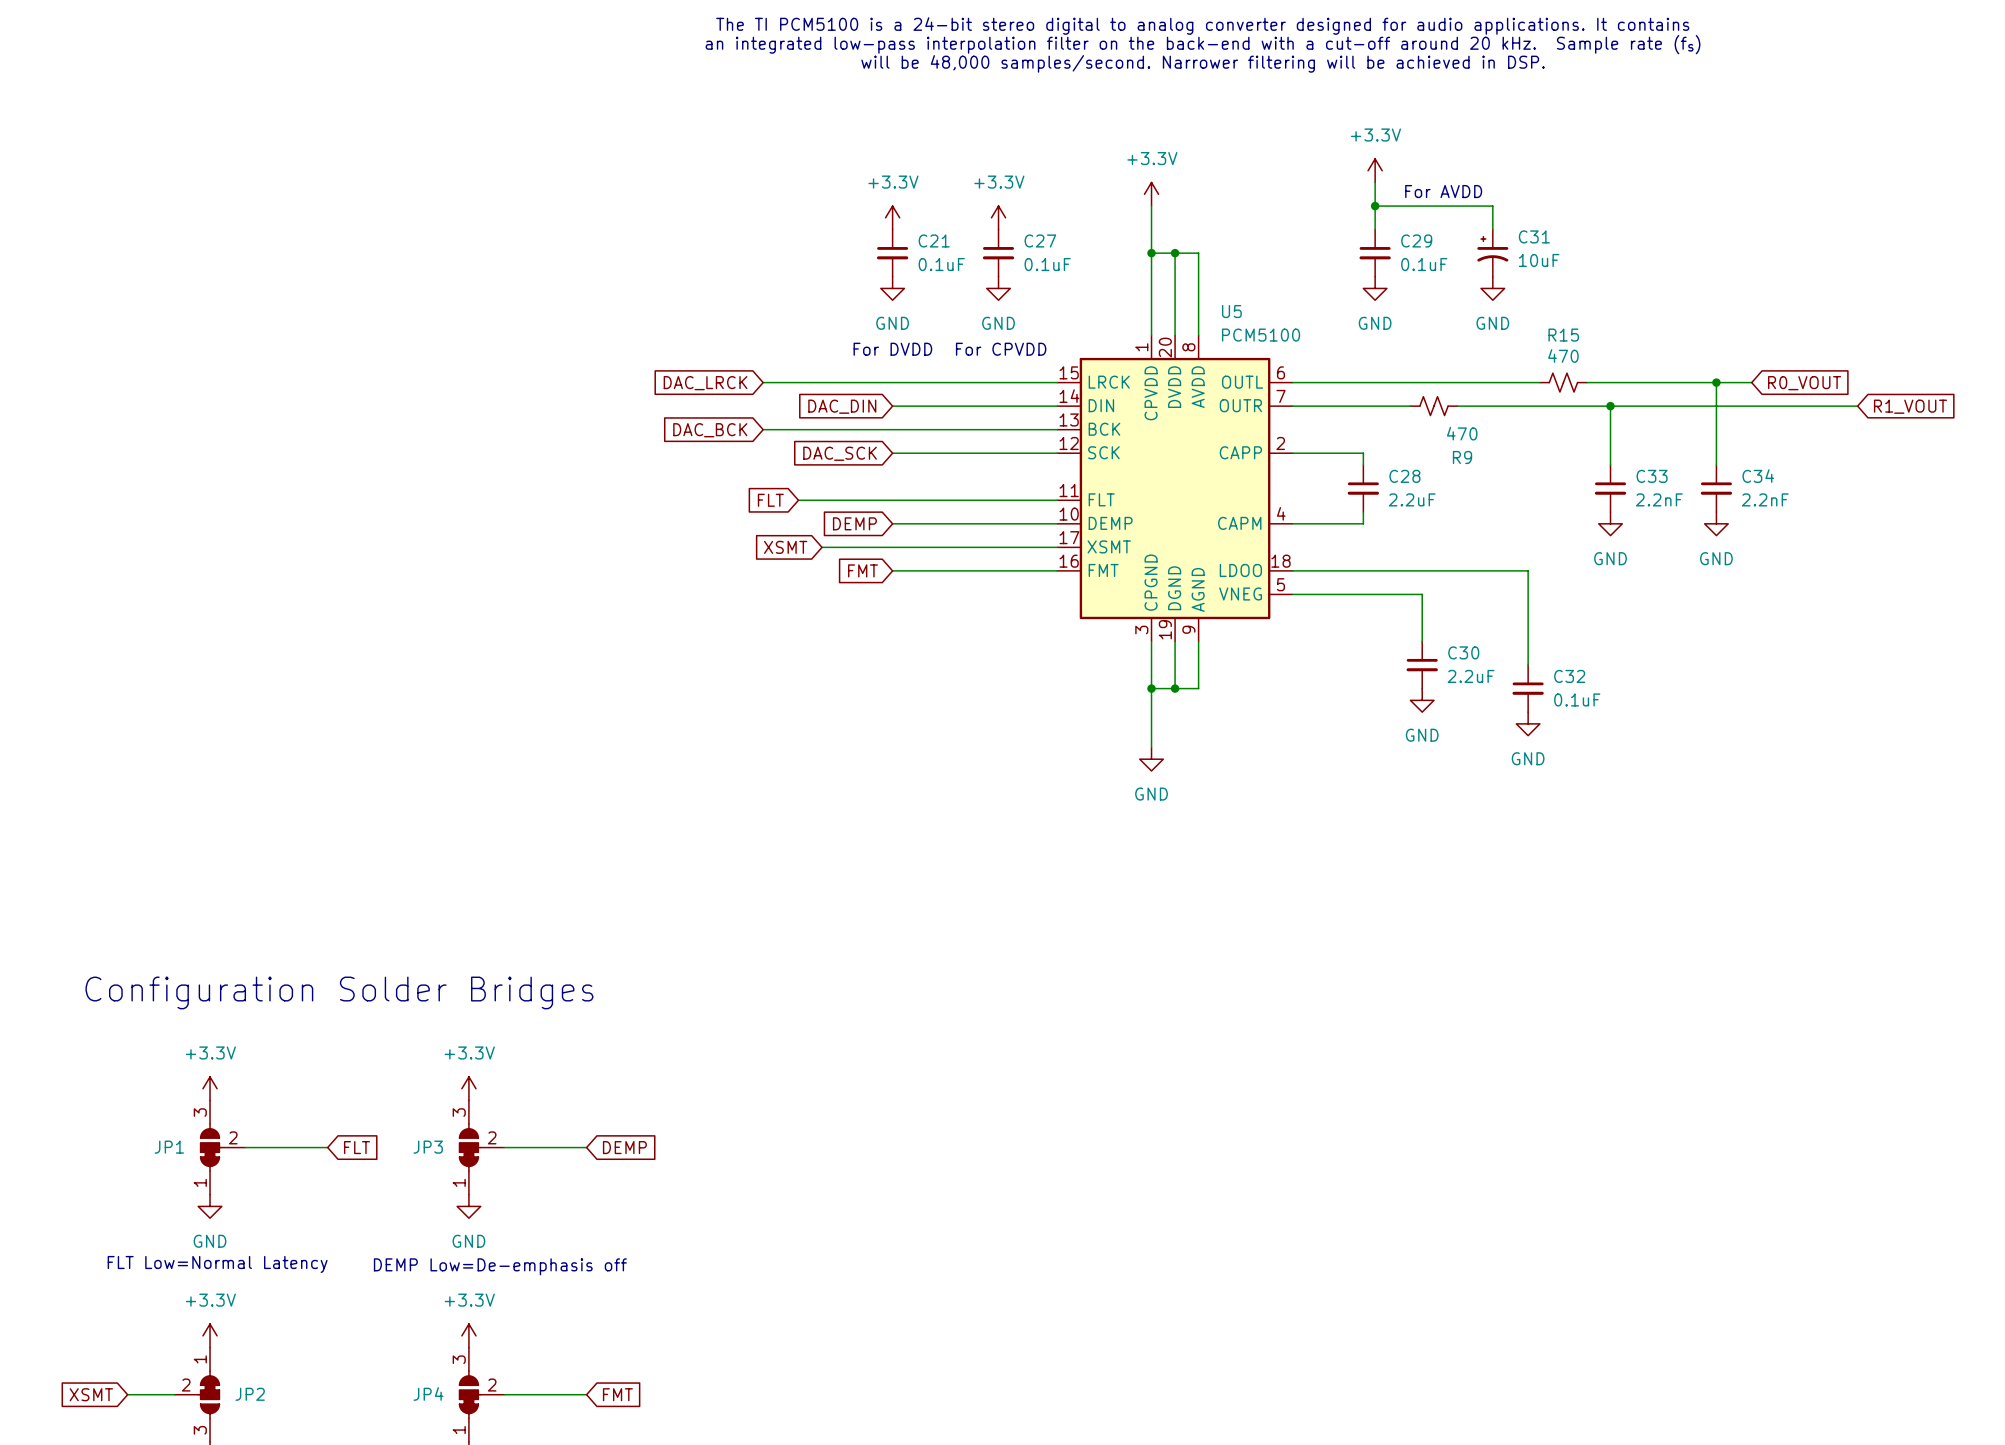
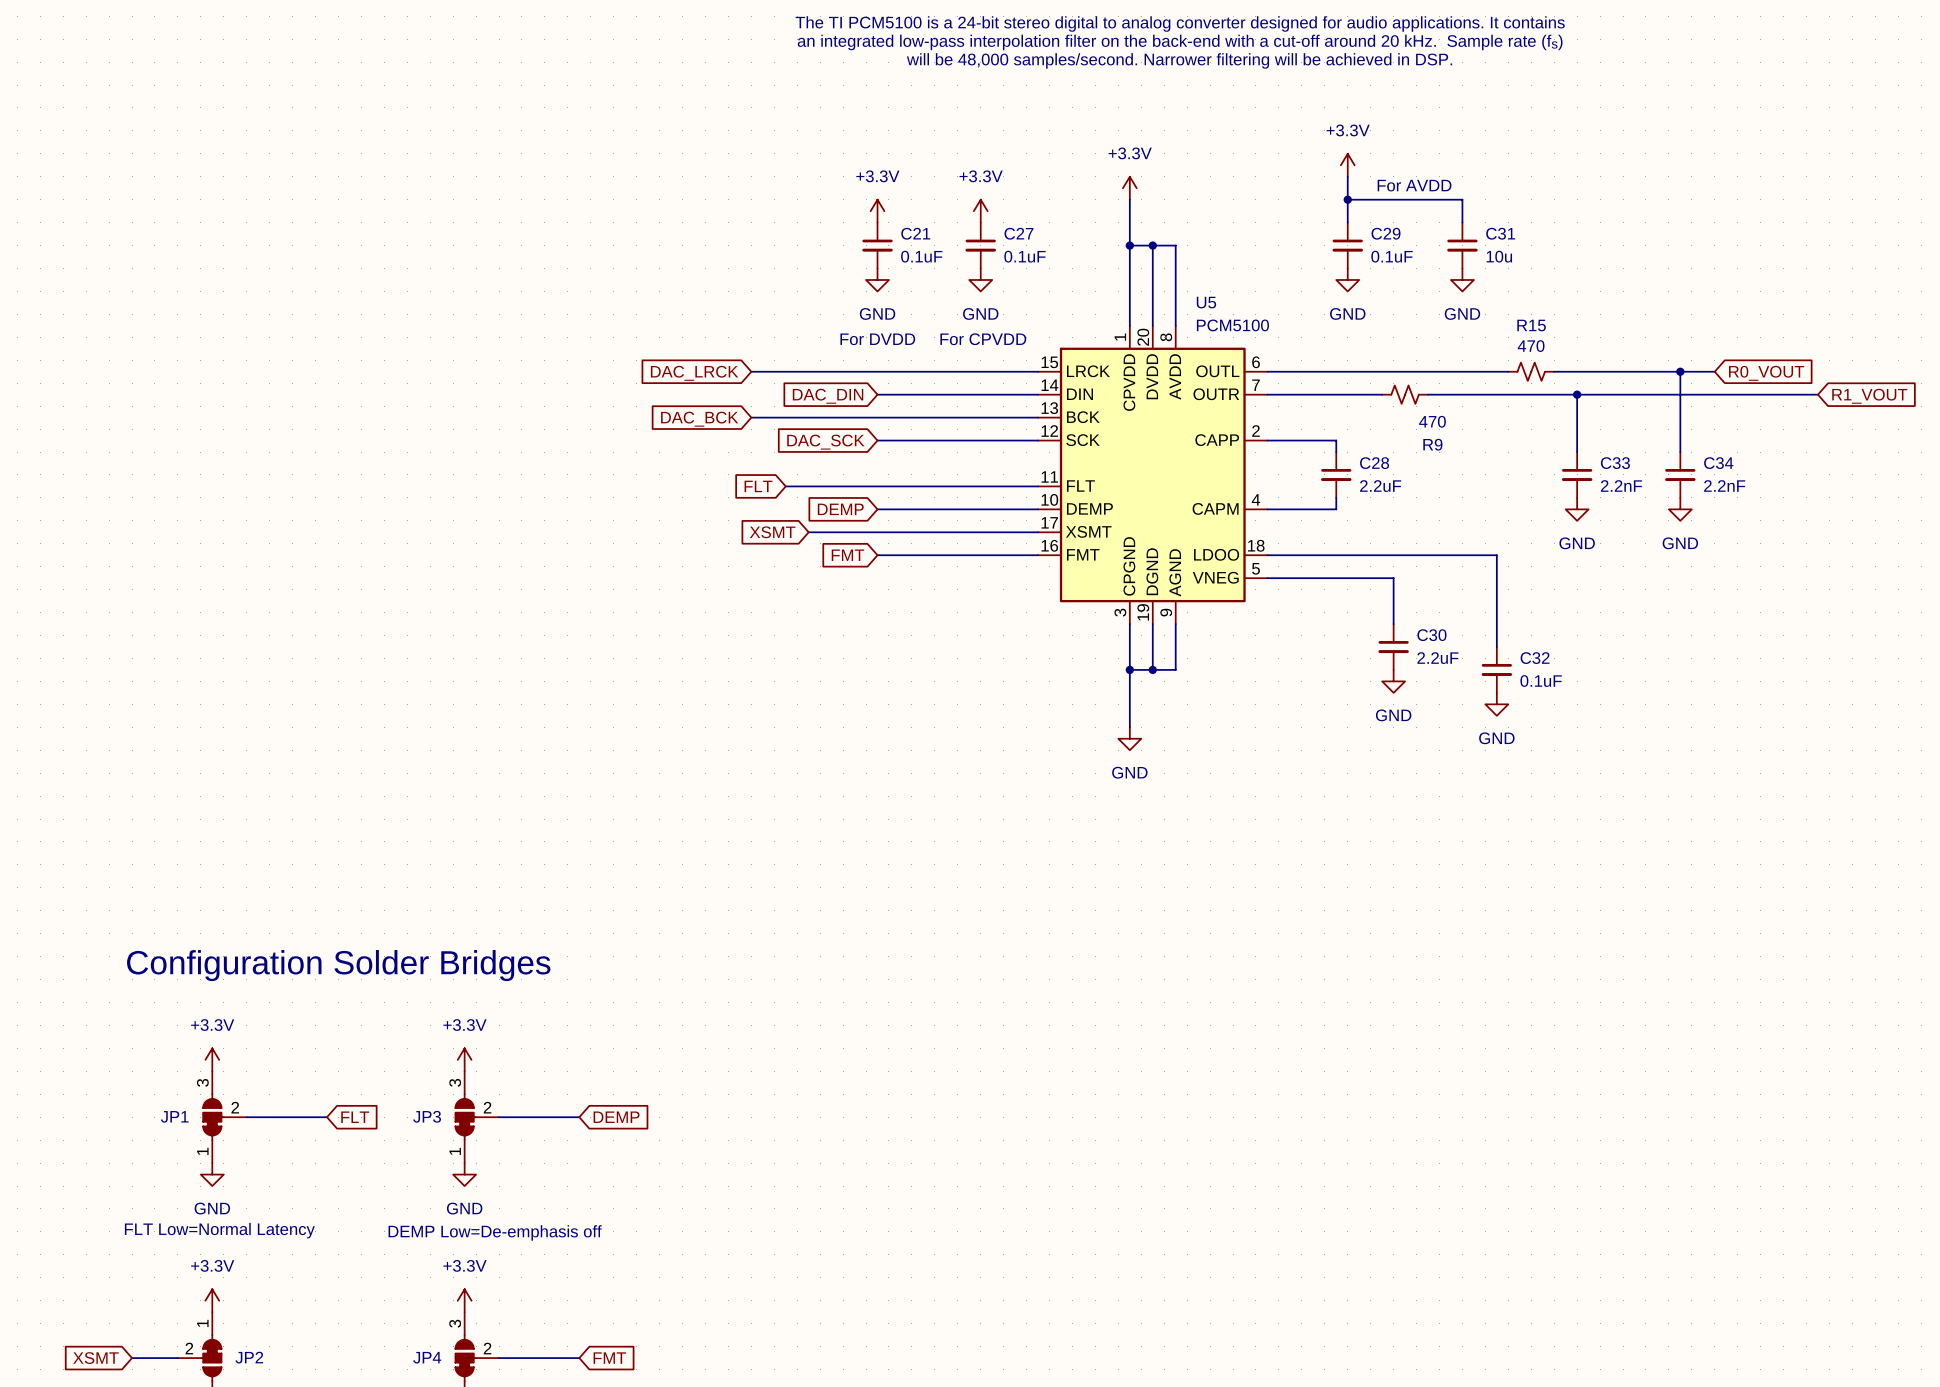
C31 symbol: [1477, 229, 1509, 277] -> [1447, 222, 1478, 269]
C31 value: 10uF (1539, 260) -> 10u (1499, 256)

